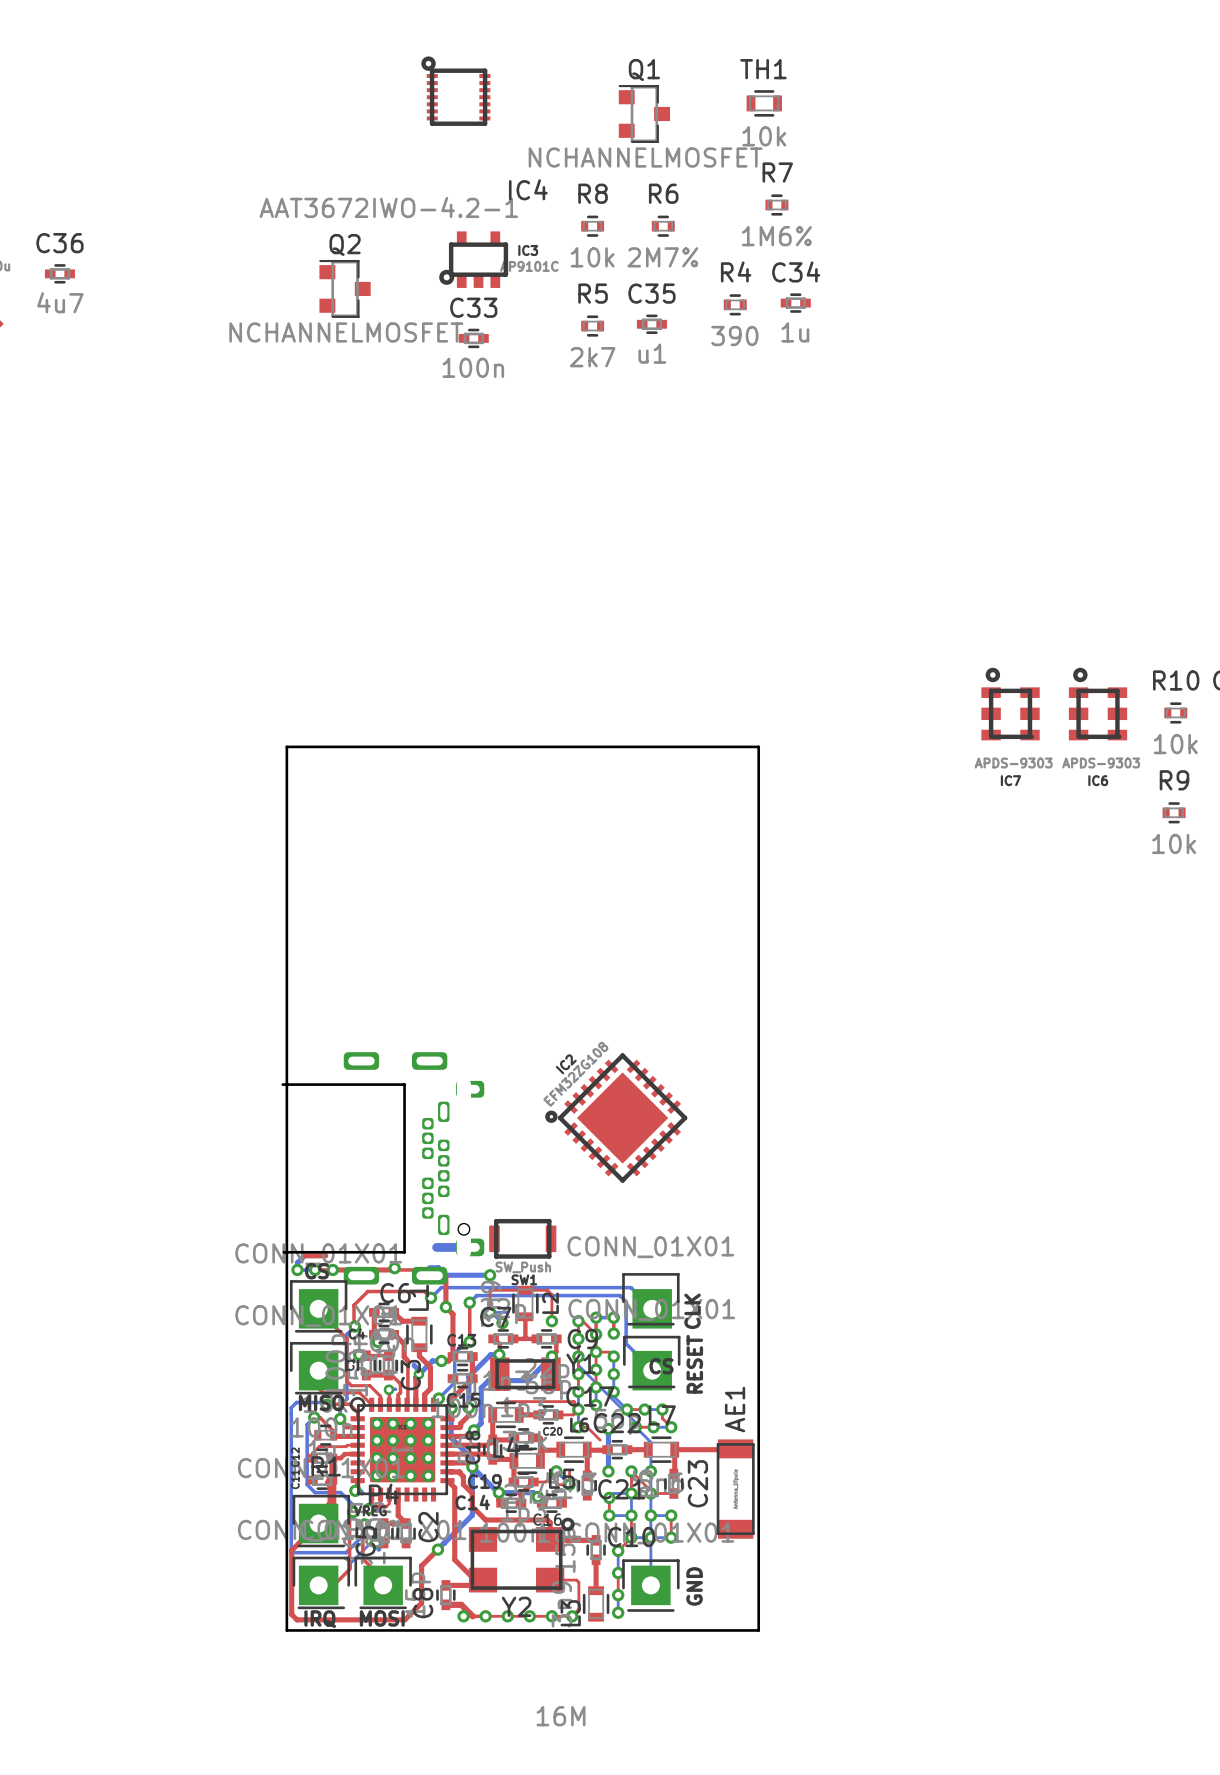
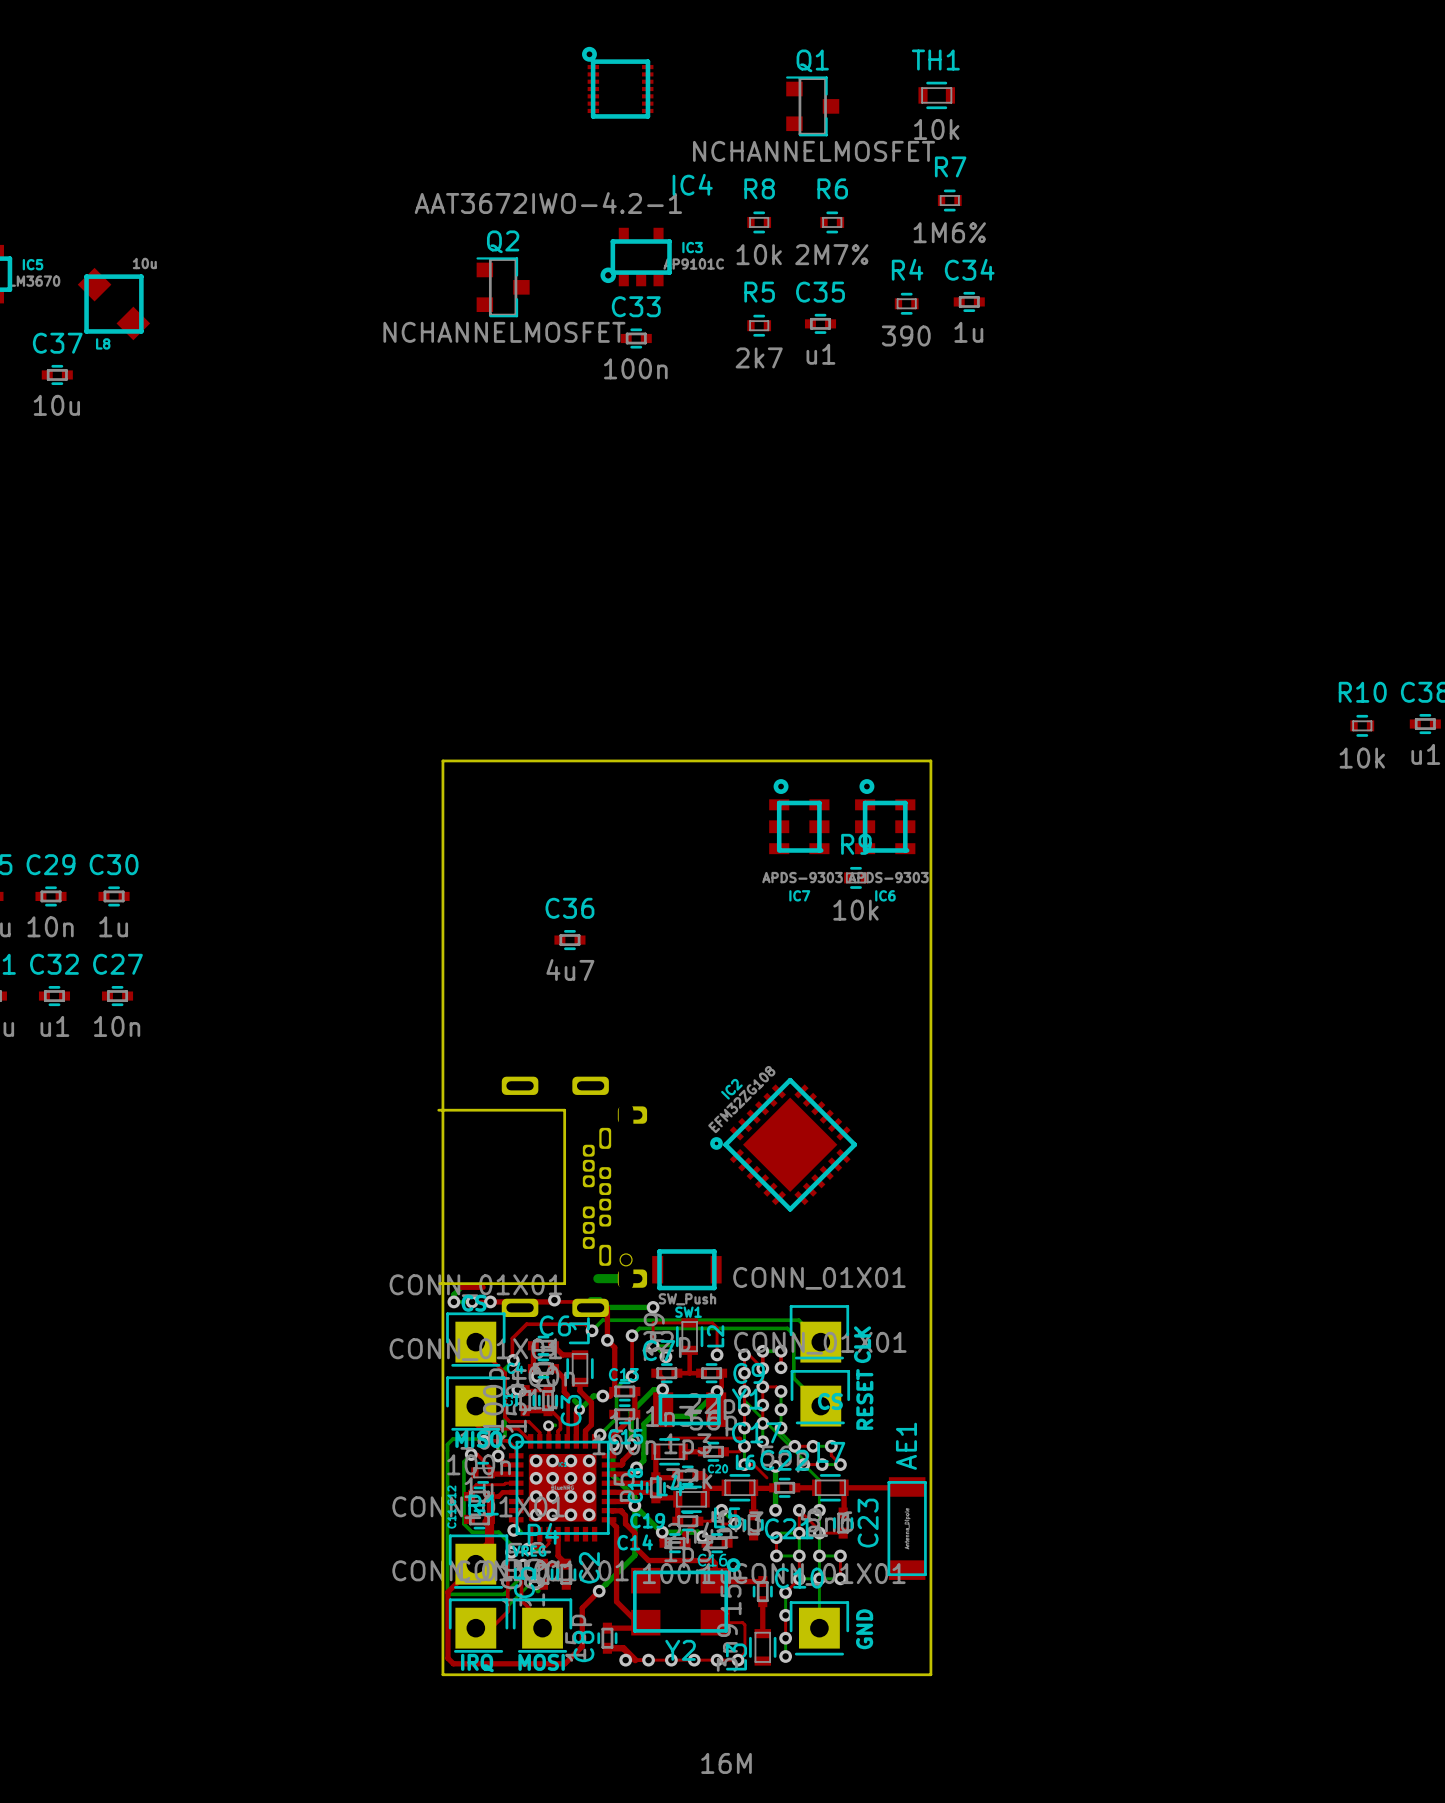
C36 position: (59, 273) -> (569, 940)
IC7 position: (1010, 704) -> (799, 816)
IC6 position: (1098, 704) -> (885, 816)
R9 position: (1174, 812) -> (855, 877)

